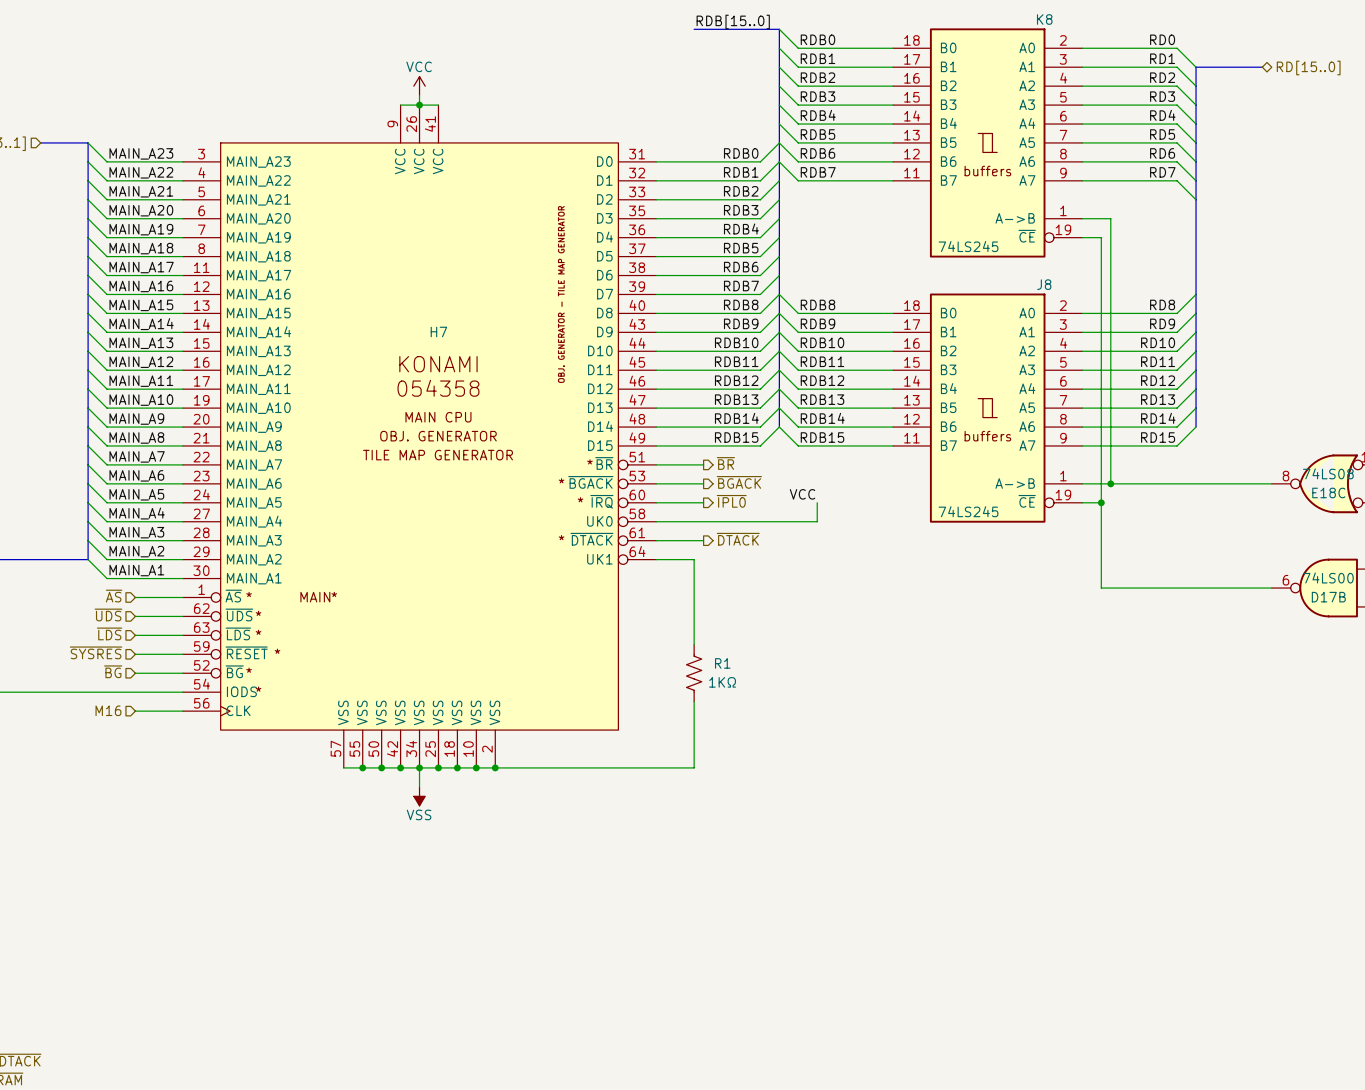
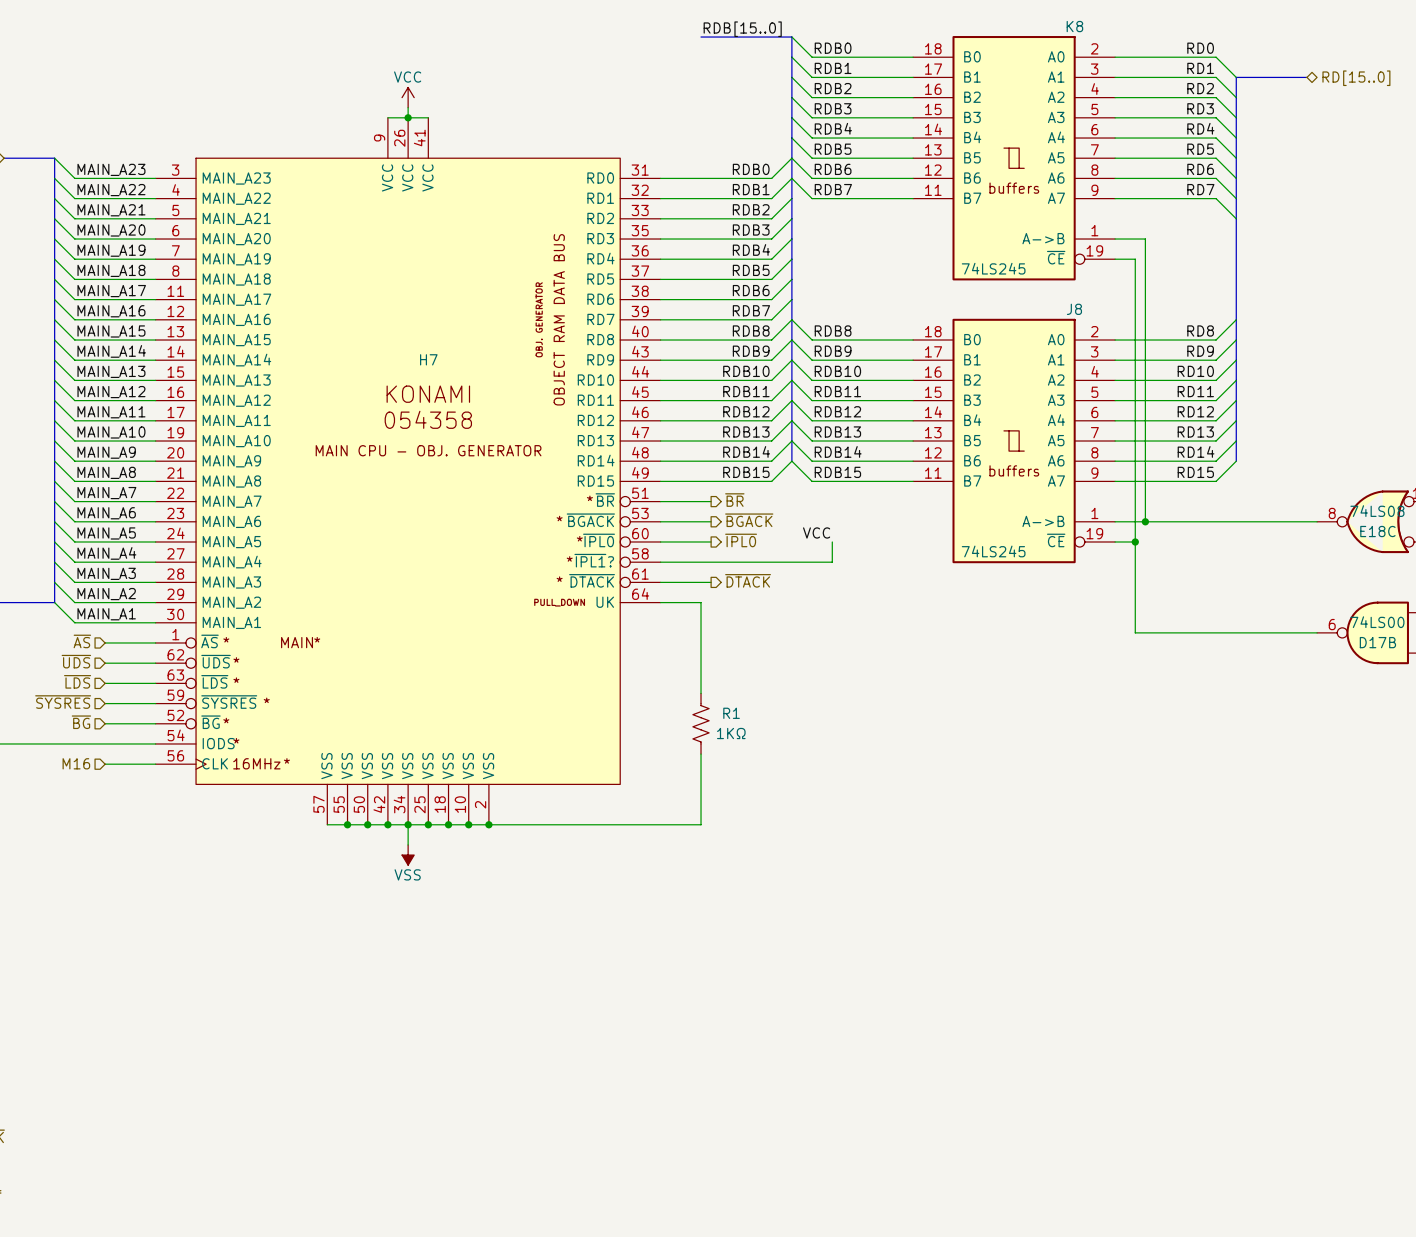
H7 symbol: [182, 105, 657, 768] -> [155, 117, 661, 825]

